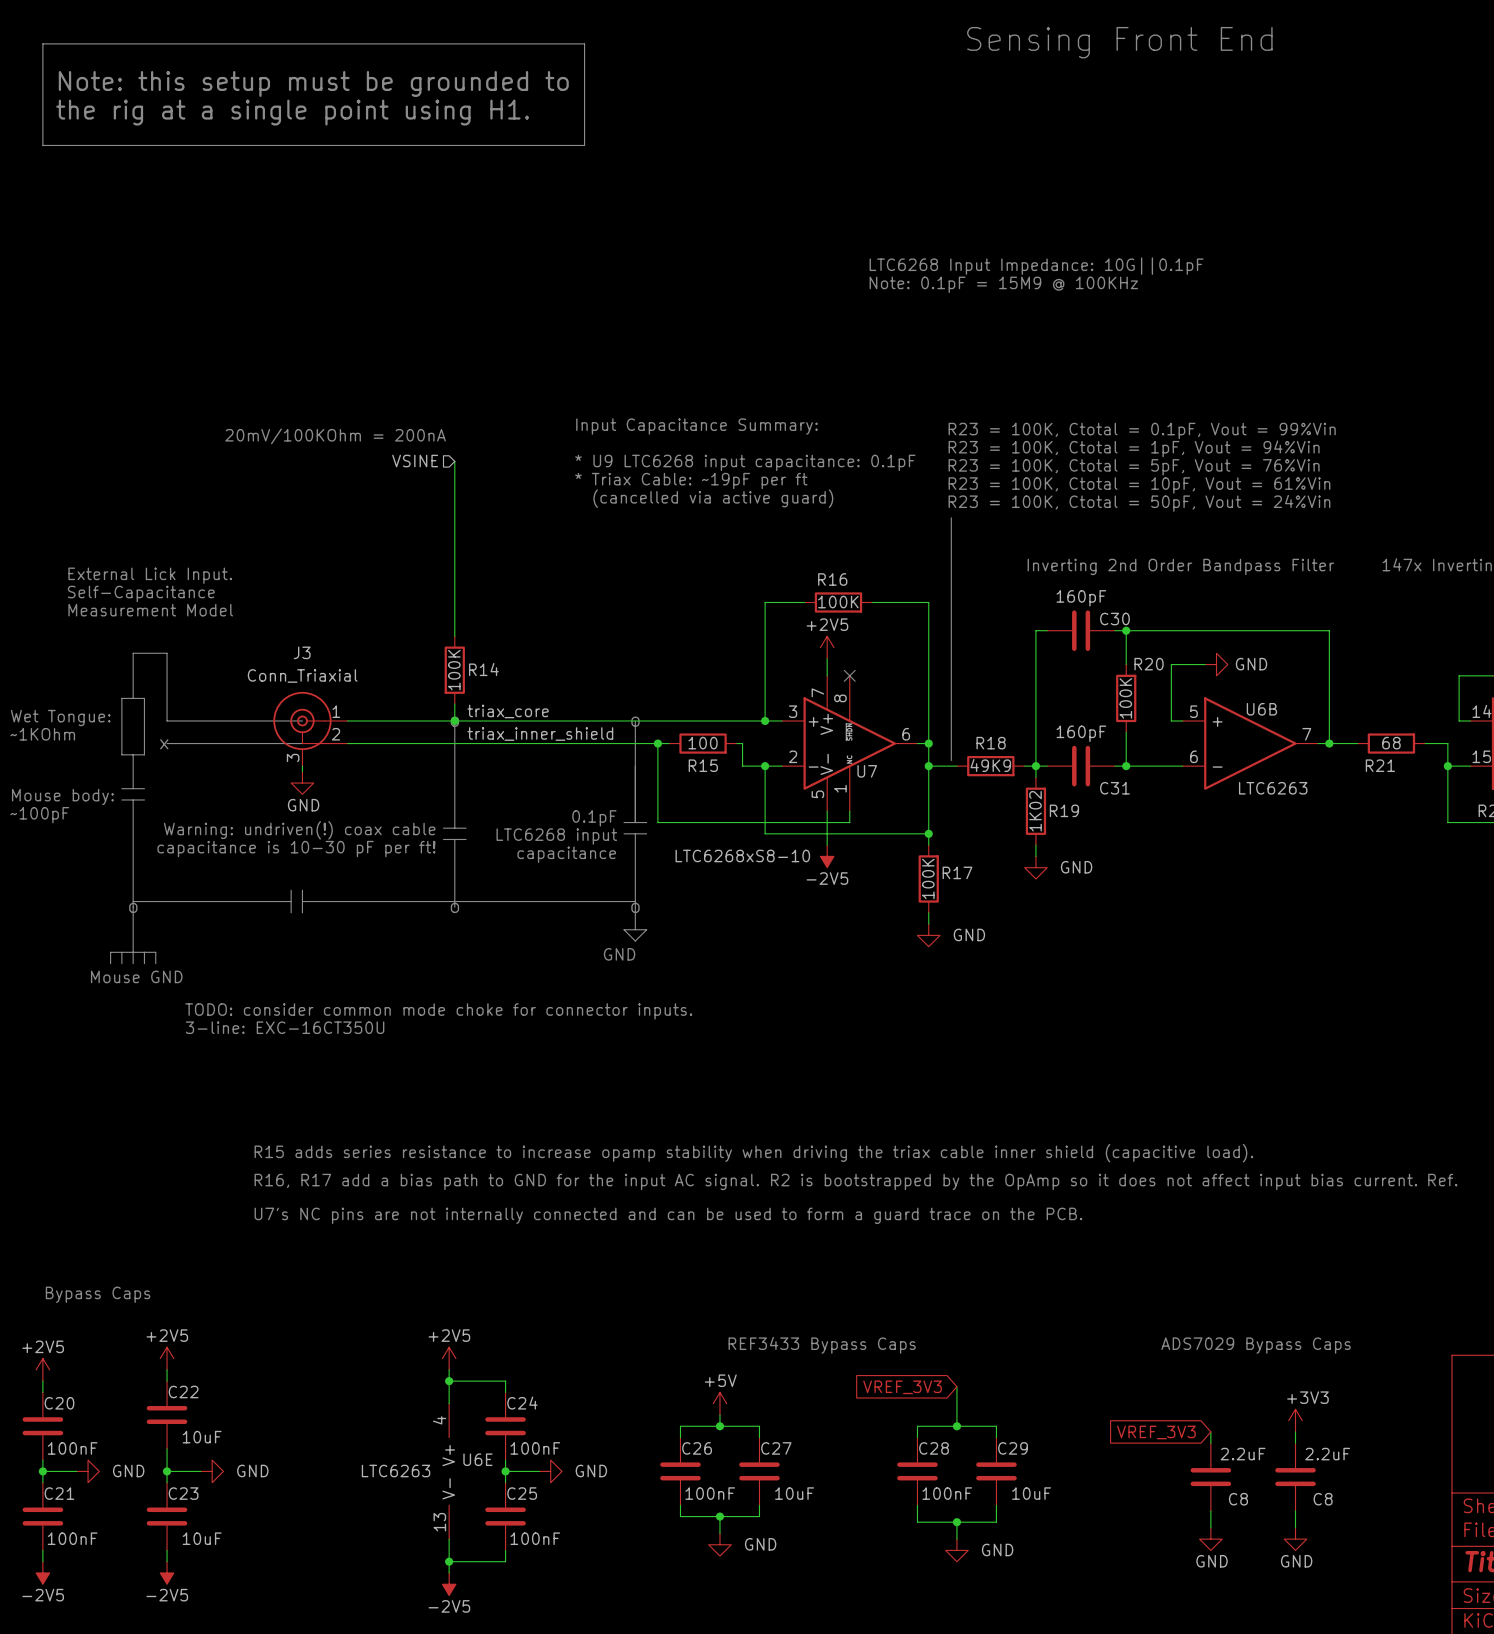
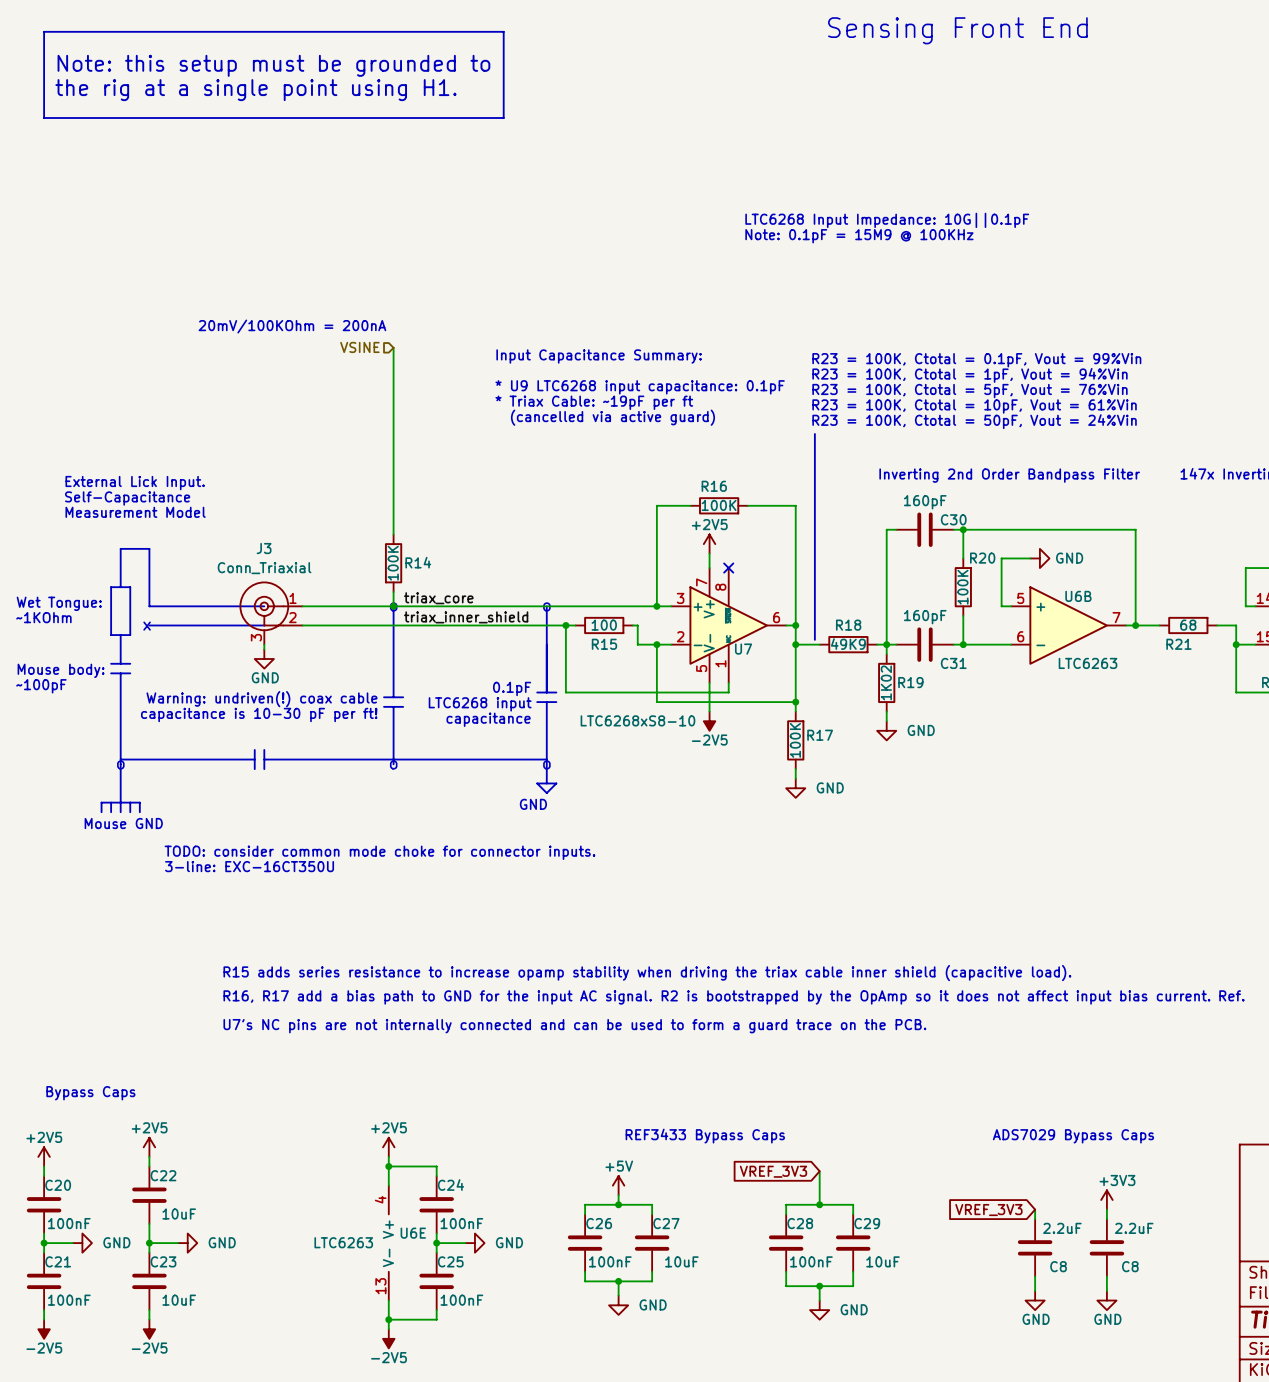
wire: none -> (393, 347) (393, 386)
text position: 20mV/100KOhm = 200nA (335, 436) -> 20mV/100KOhm = 200nA (292, 326)
hierarchical label position: VSINE (415, 461) -> VSINE (359, 347)

